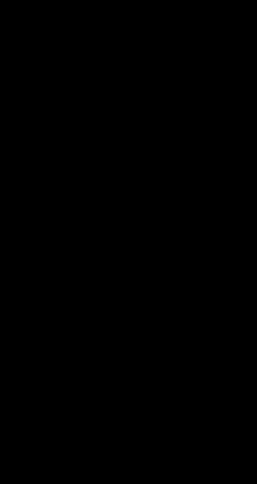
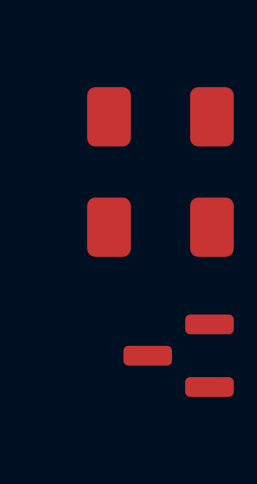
part: none -> (160, 116)
part: none -> (160, 227)
part: none -> (178, 355)

